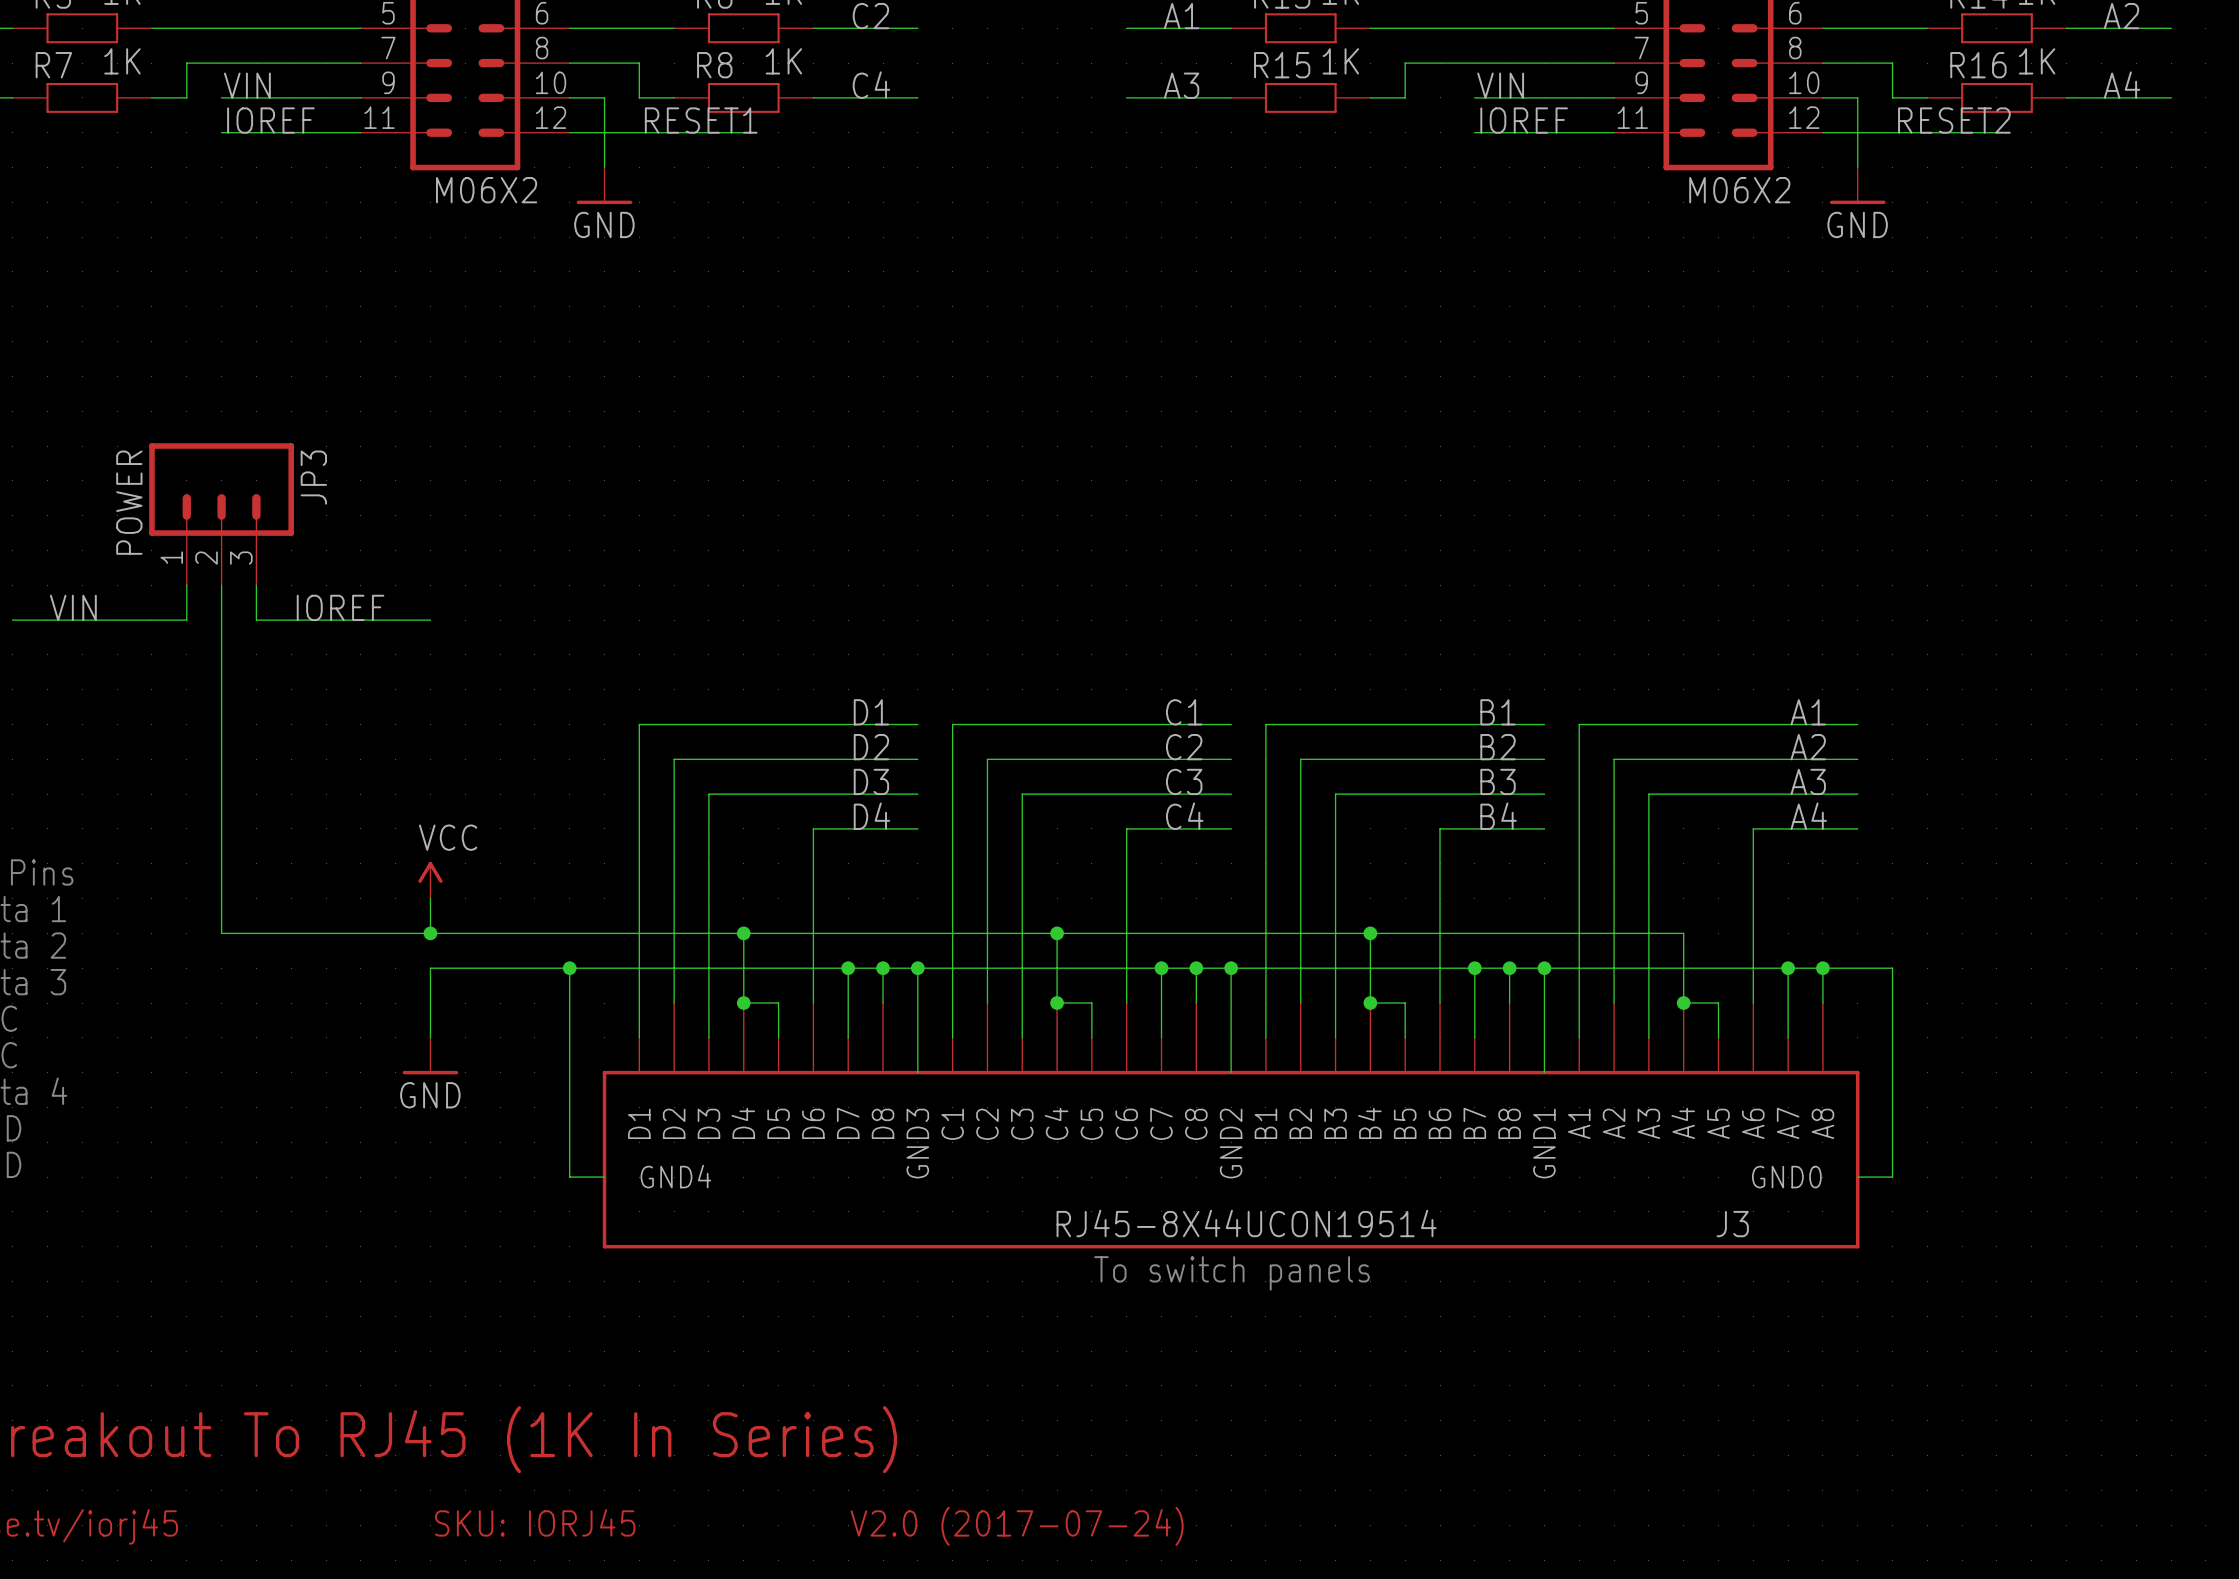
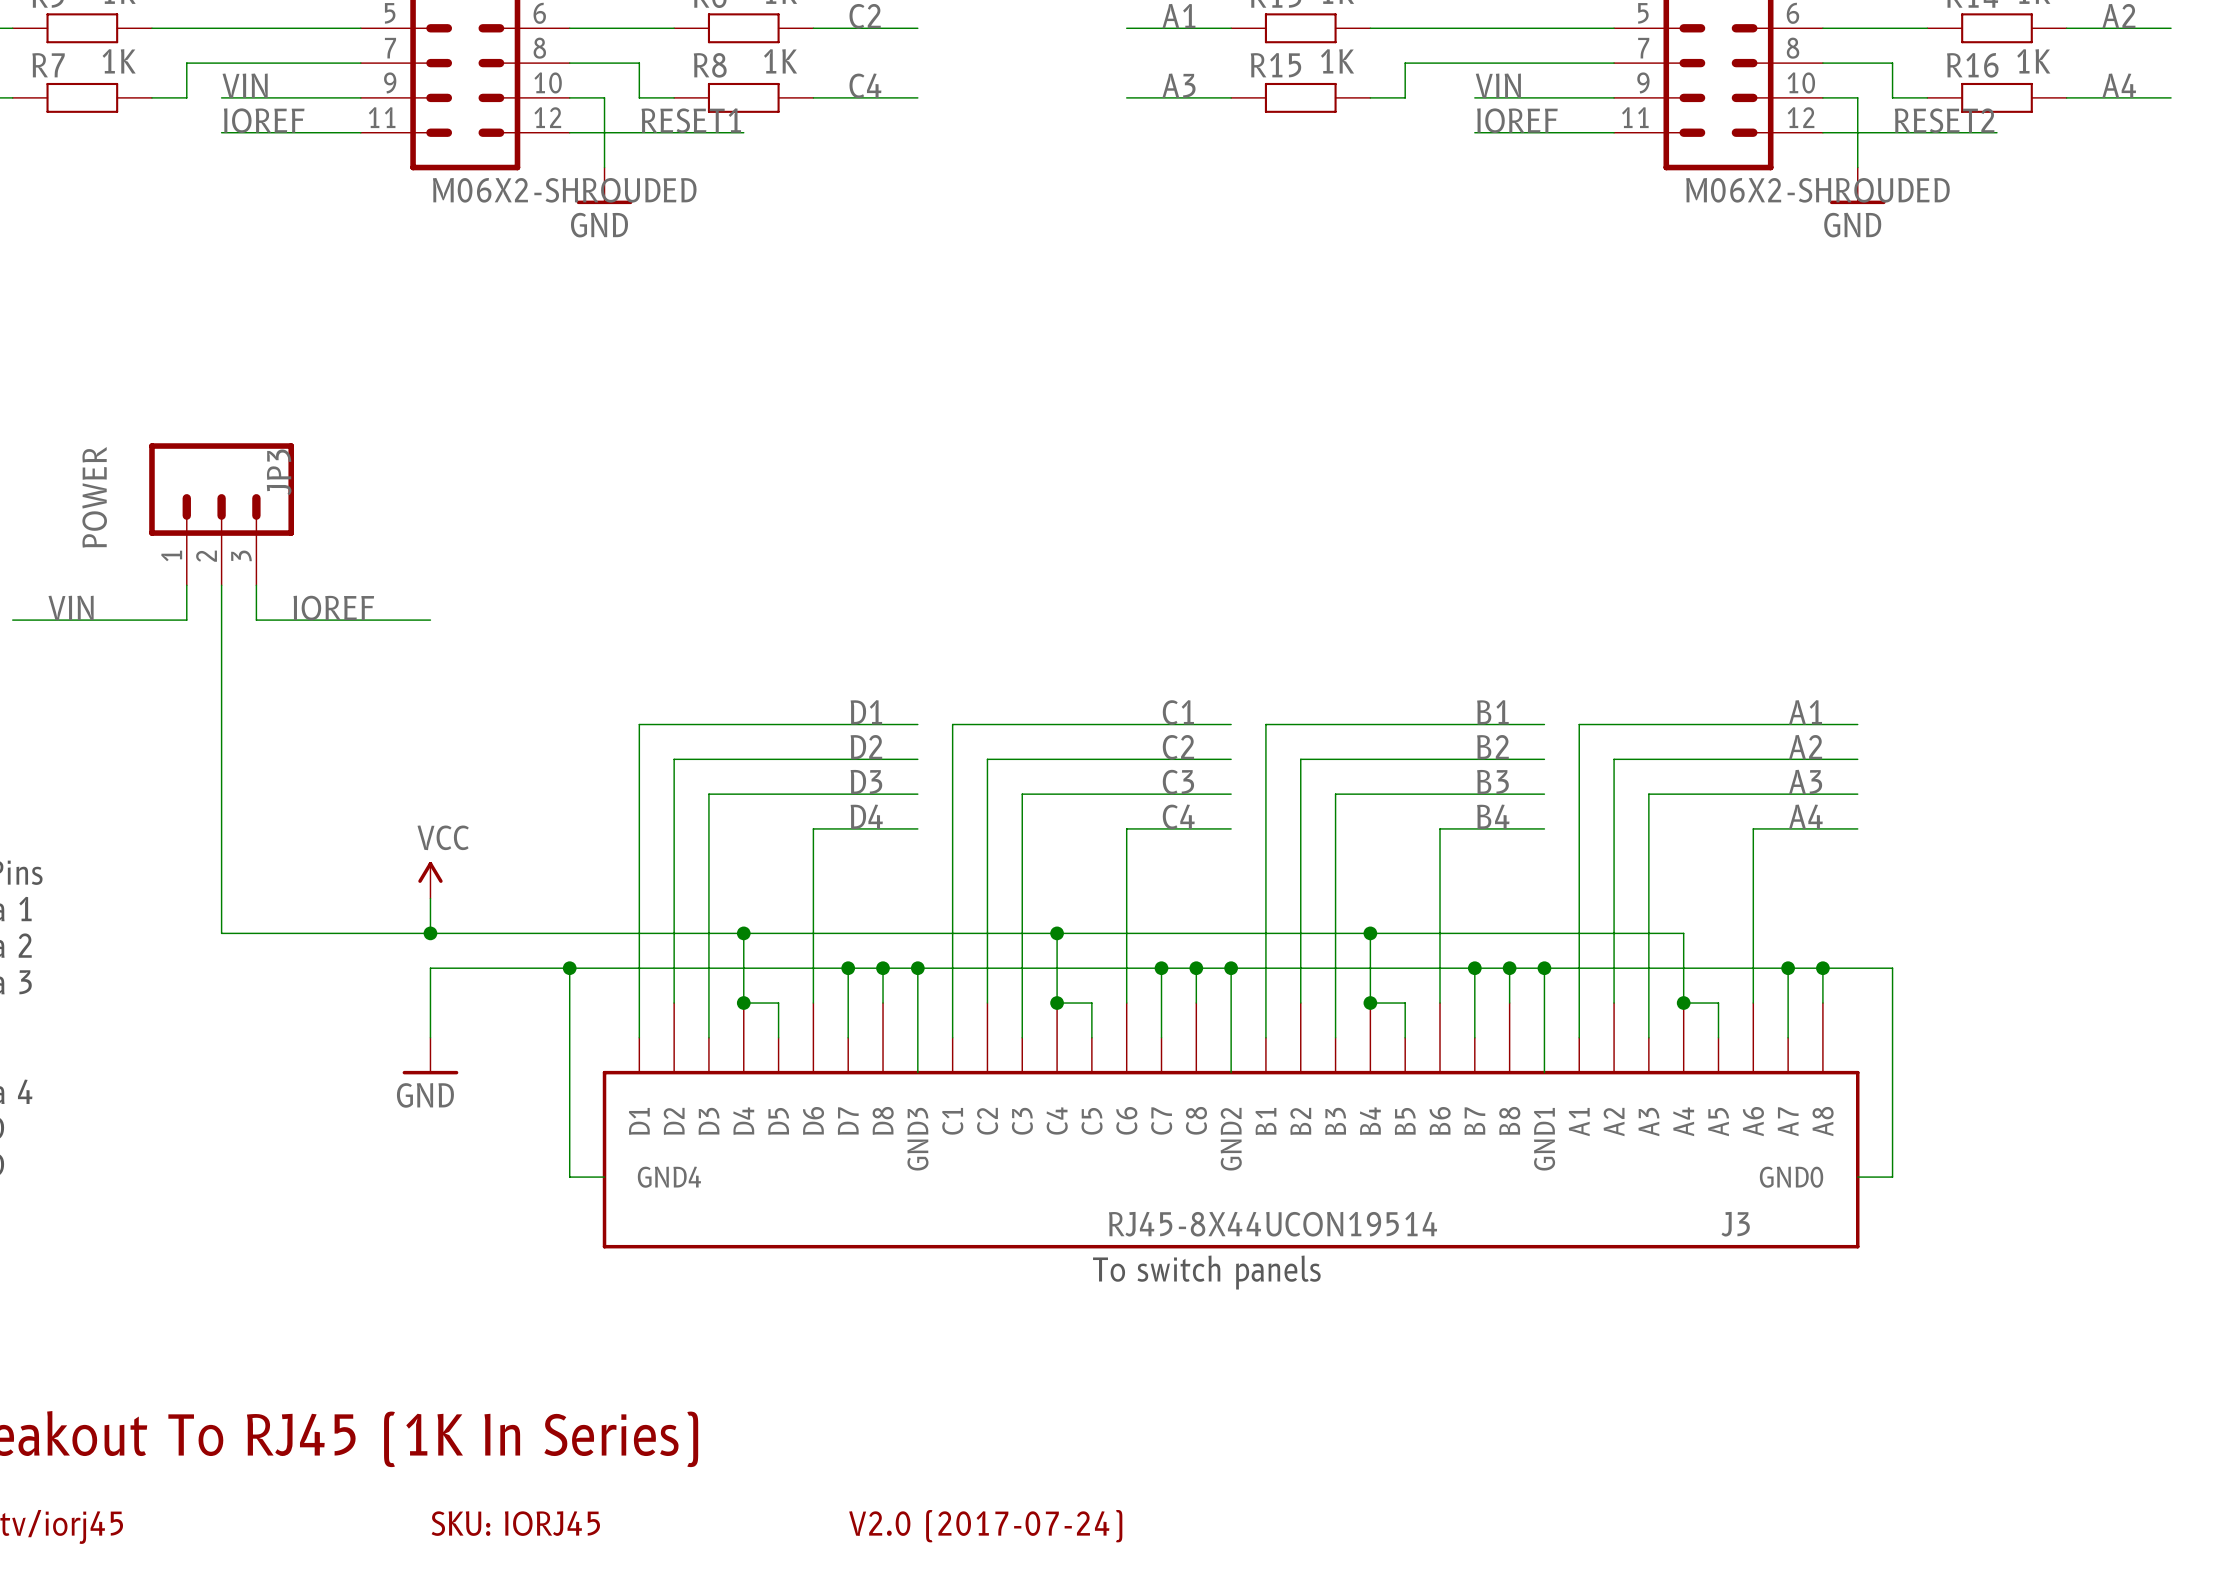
part value: M06X2 (486, 190) -> M06X2-SHROUDED (564, 190)
part value: M06X2 (1739, 190) -> M06X2-SHROUDED (1817, 190)
JP3 name position: JP3 (313, 477) -> JP3 (279, 472)
JP3 value position: POWER (129, 502) -> POWER (94, 497)

